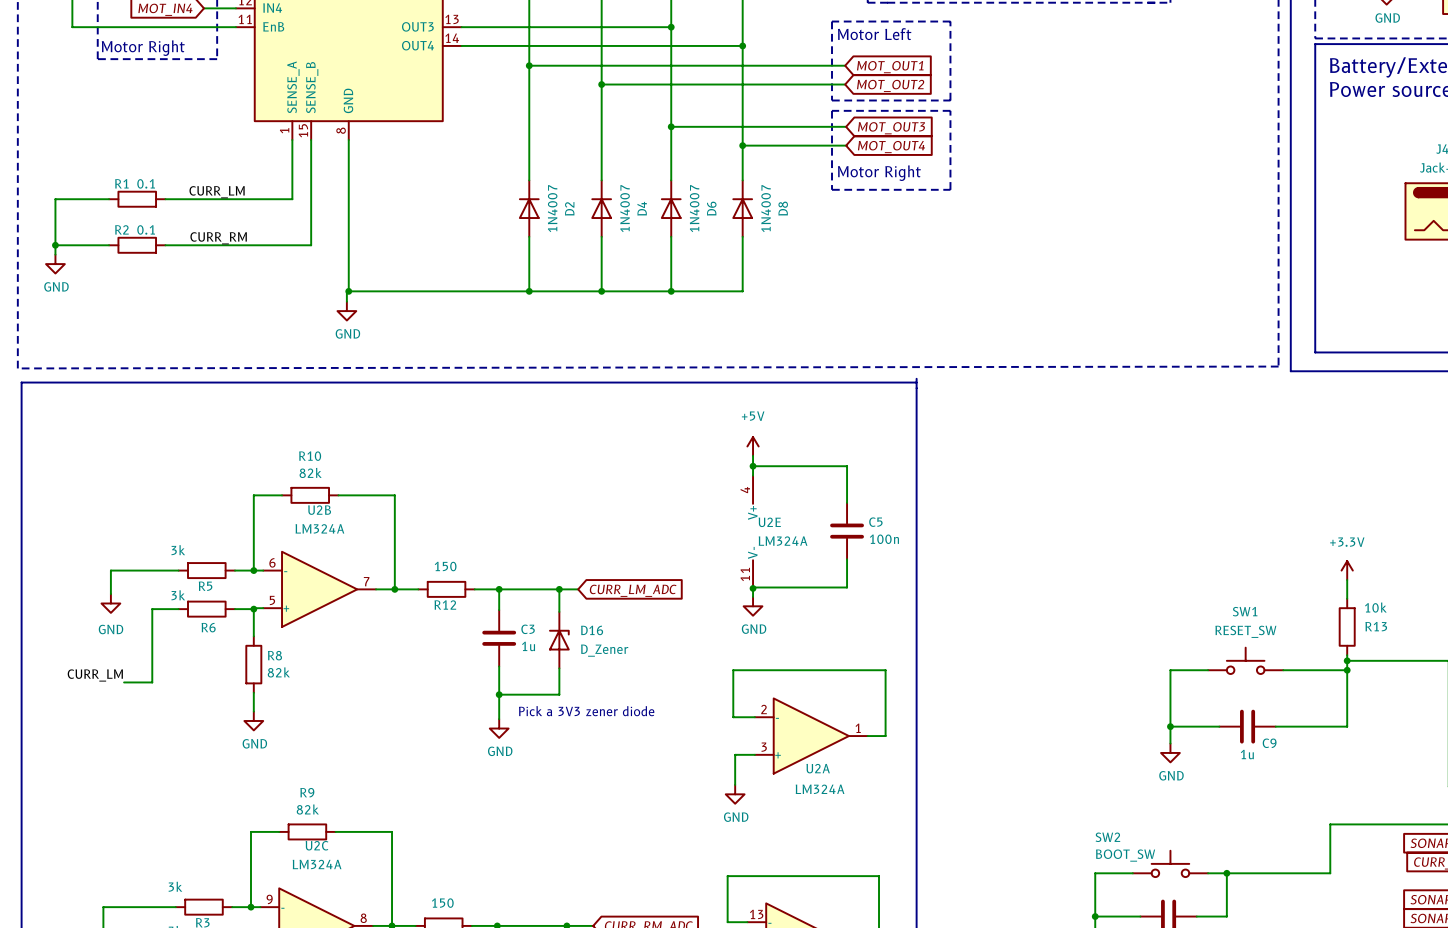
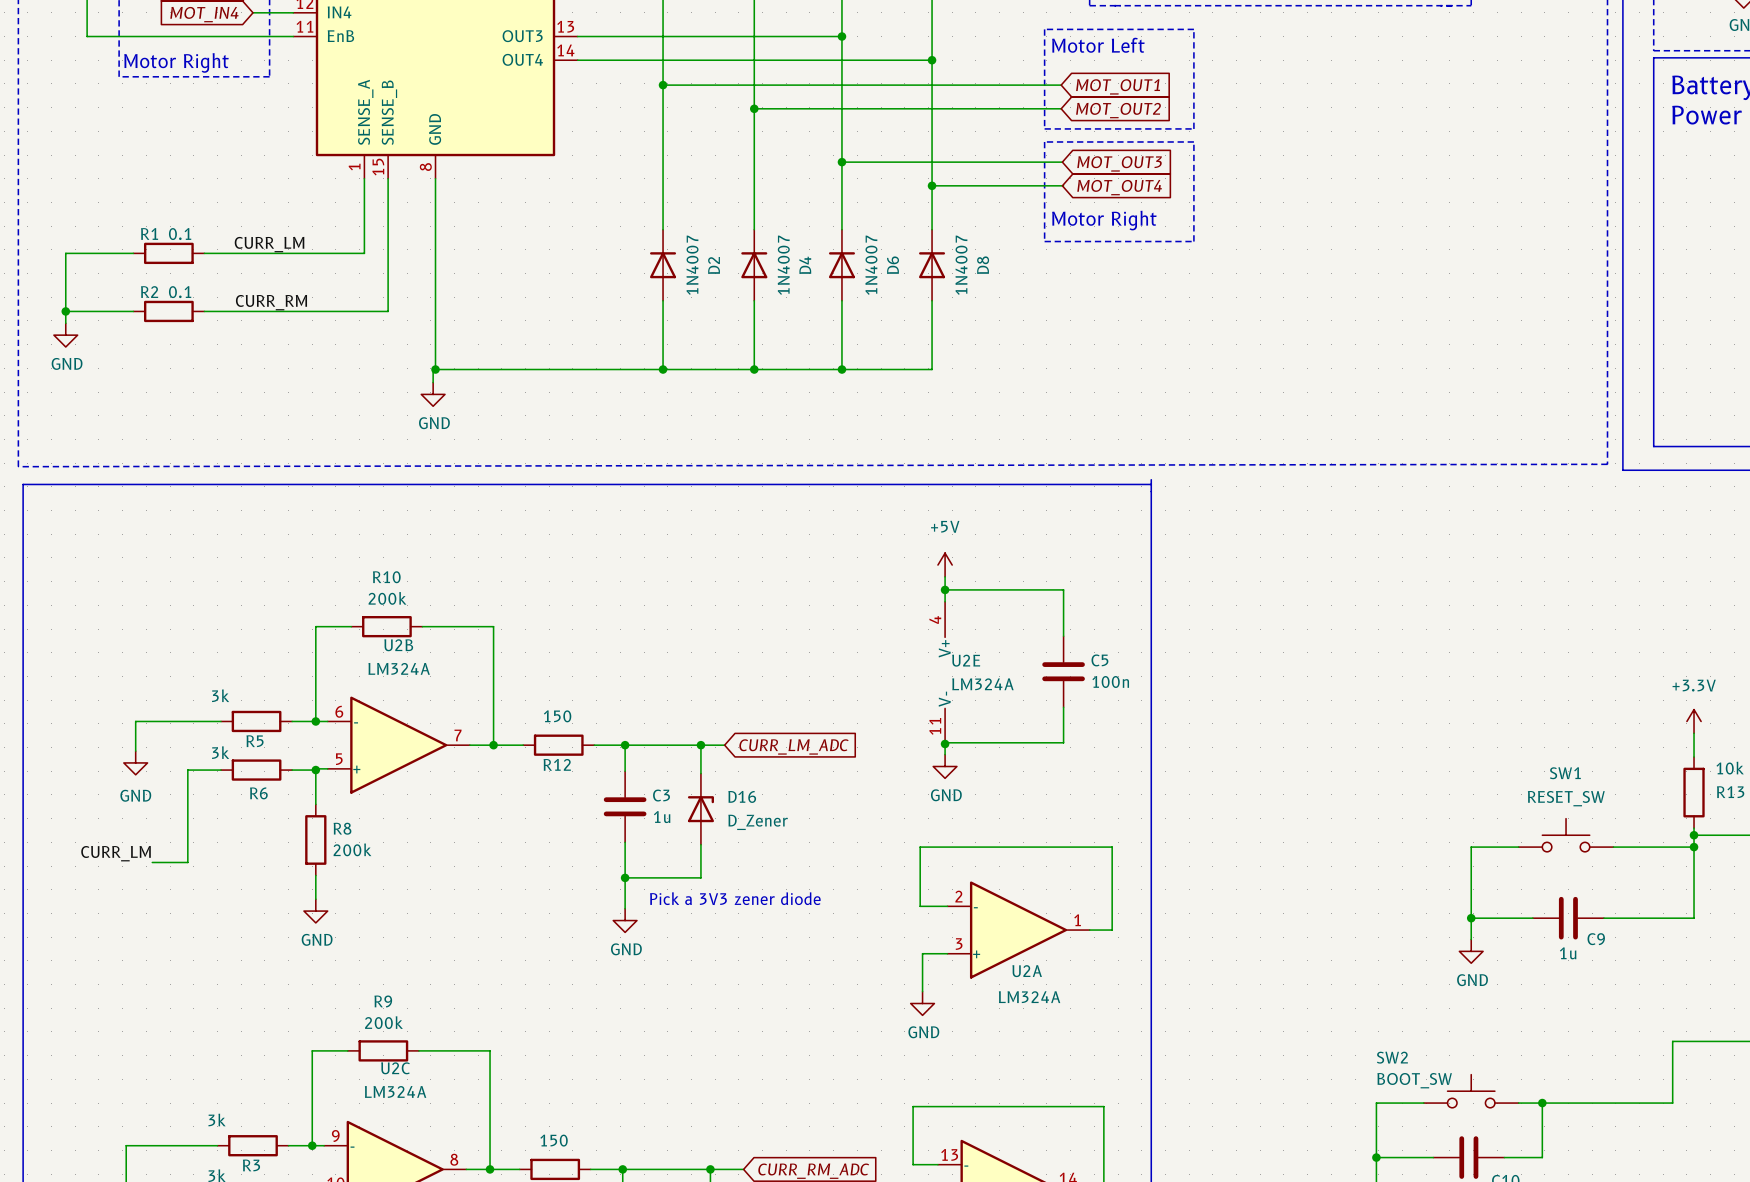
R10 value: 82k (310, 472) -> 200k (387, 598)
R8 value: 82k (278, 672) -> 200k (352, 849)
R9 value: 82k (307, 809) -> 200k (383, 1022)

